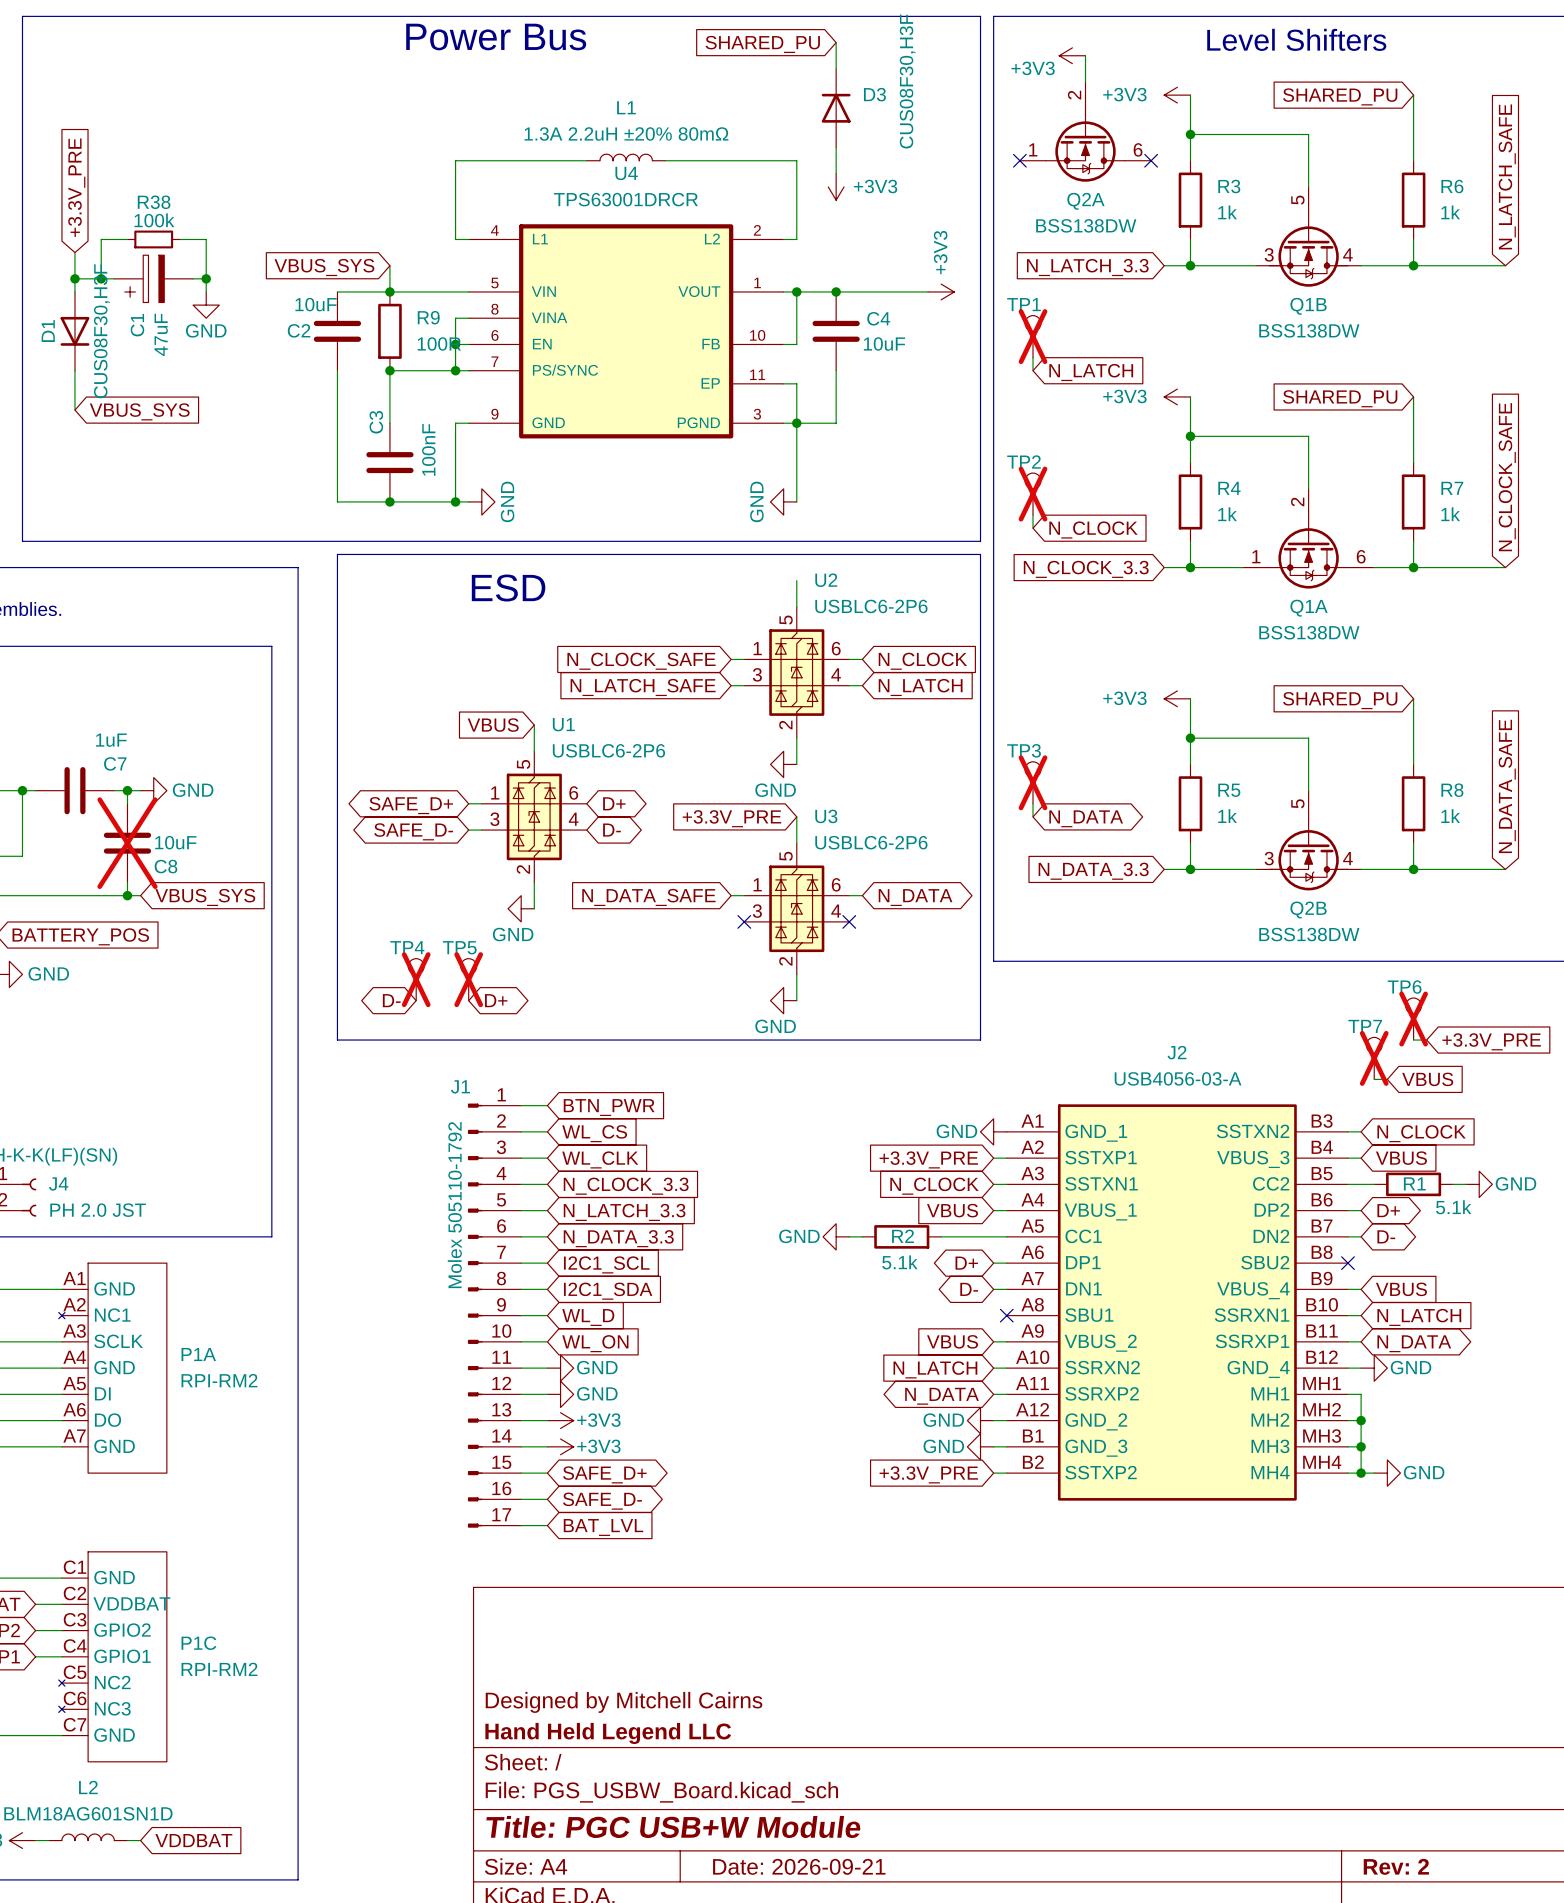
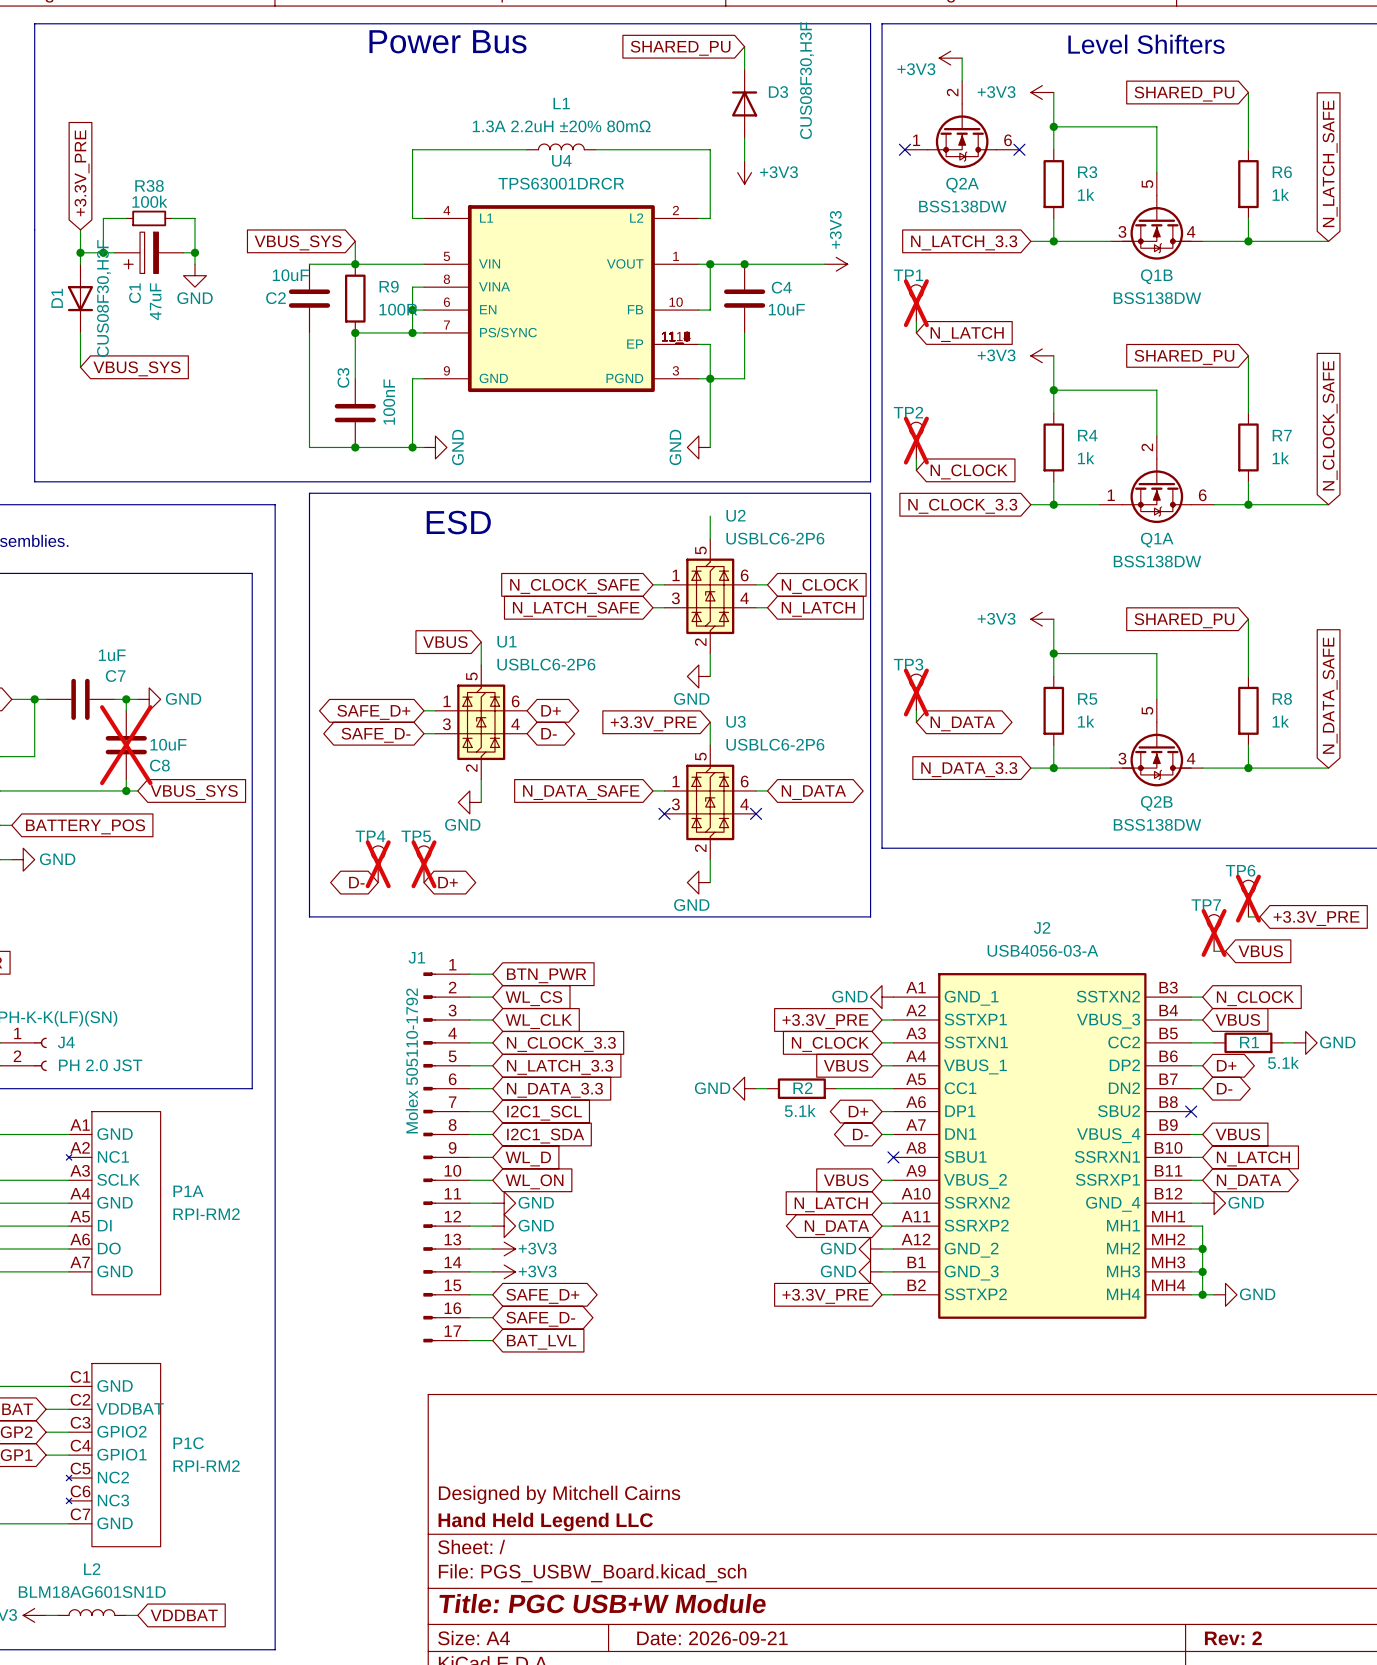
U4 symbol: [468, 224, 784, 439] -> [424, 205, 699, 393]

